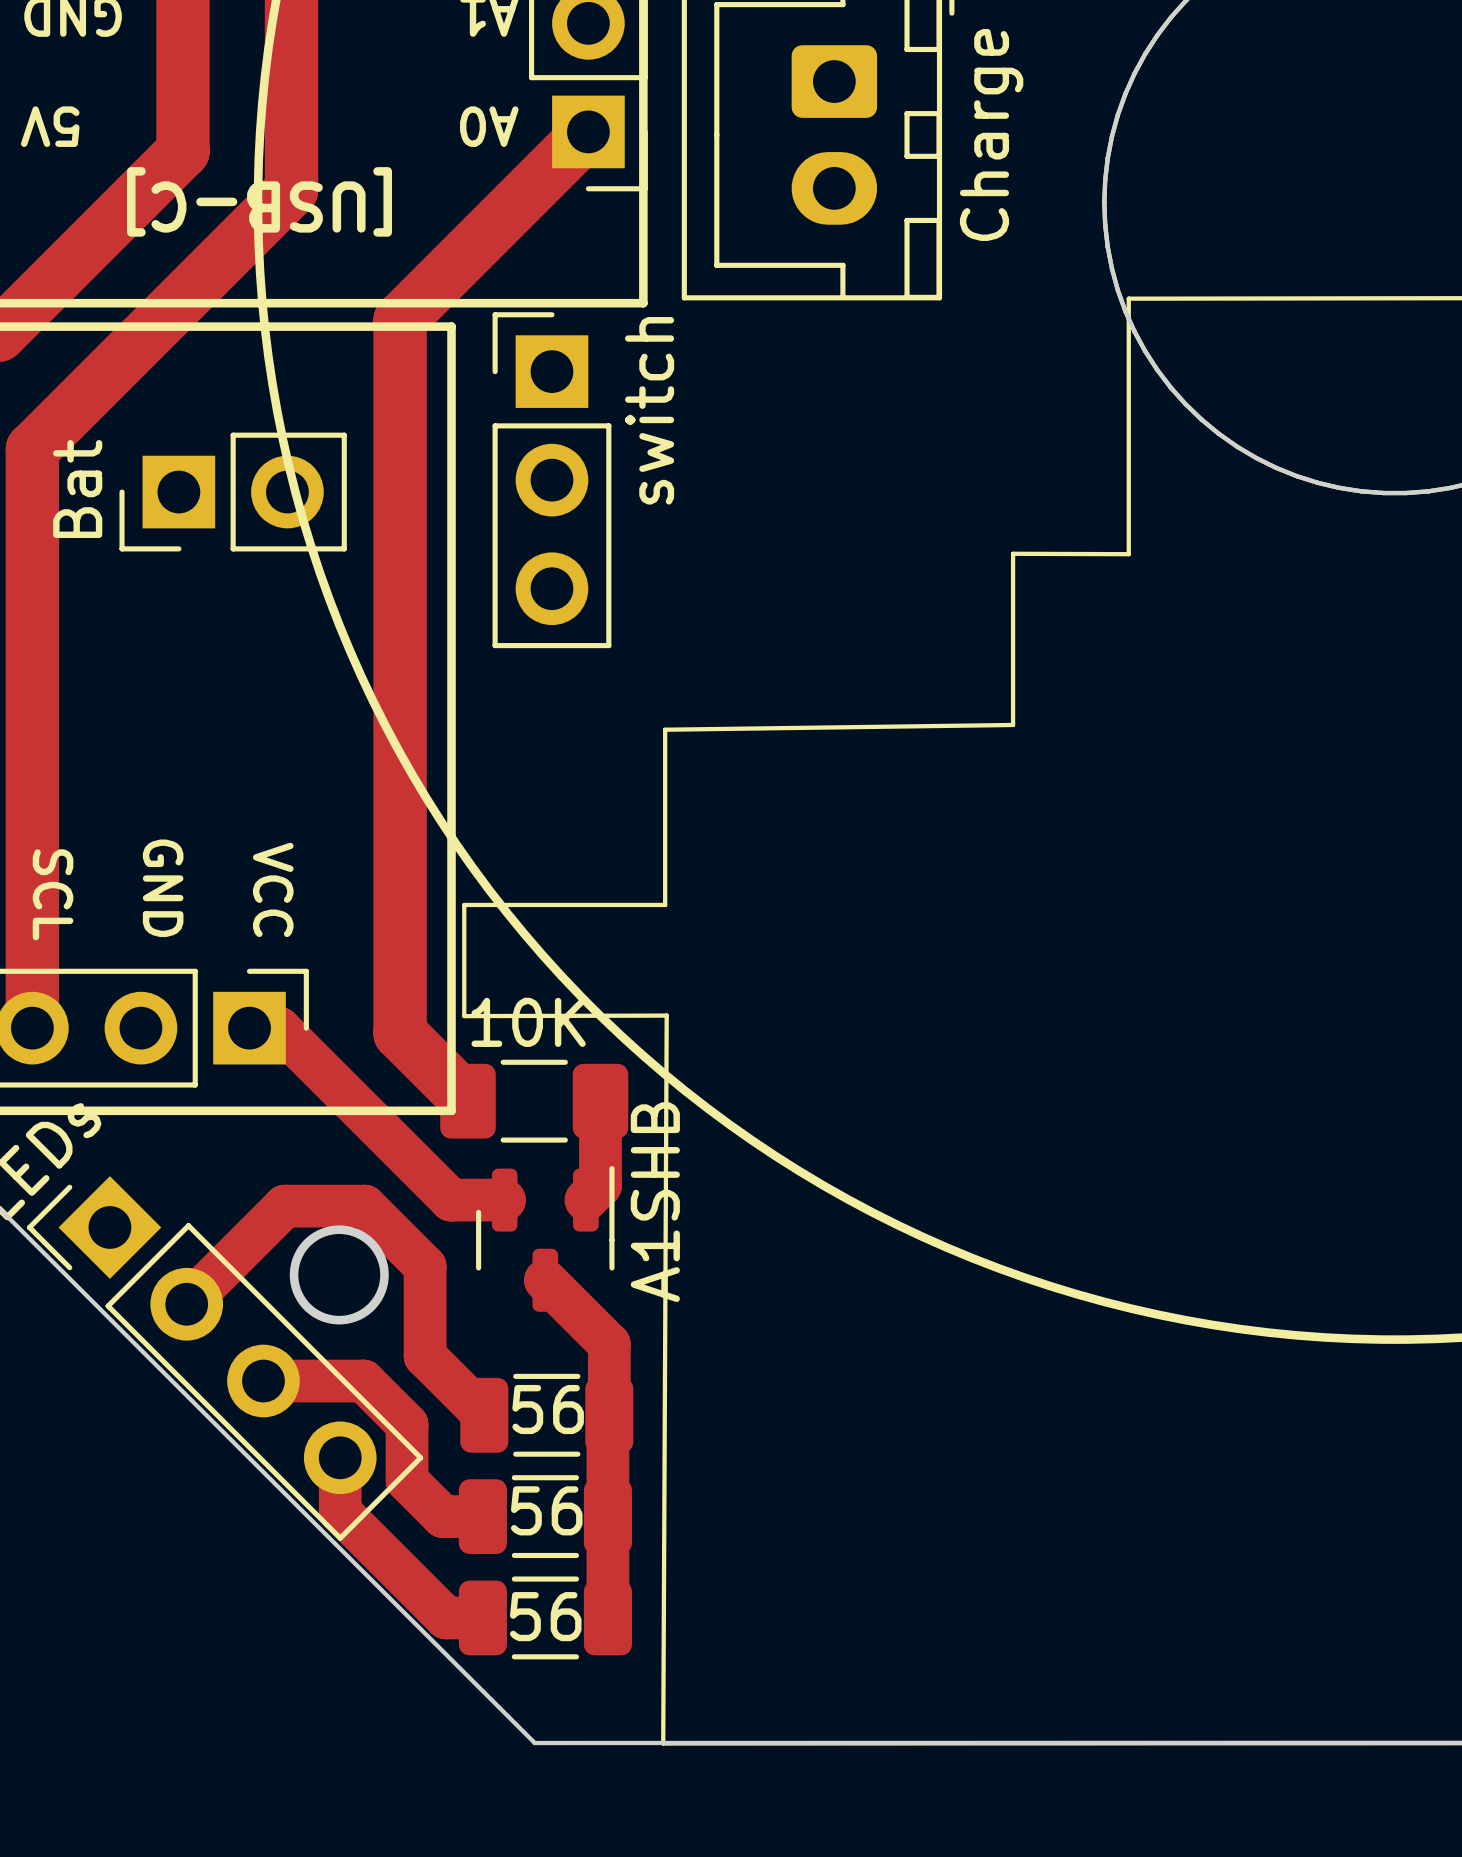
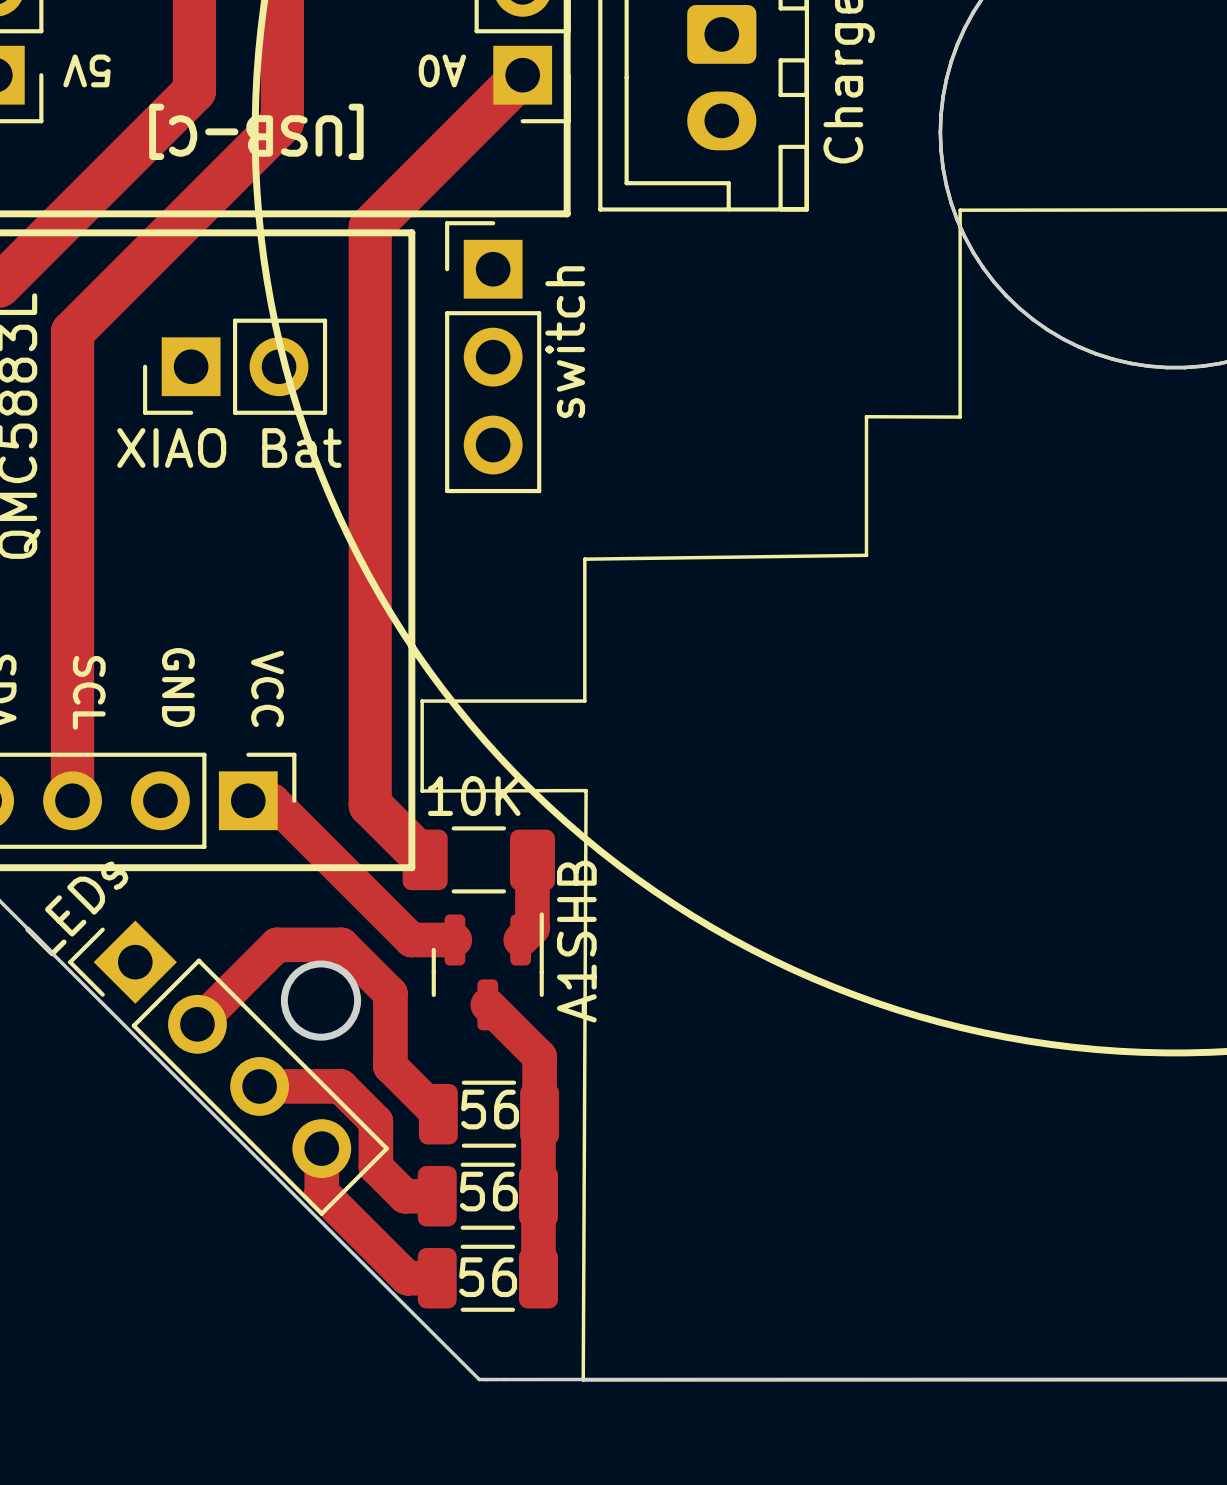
switch name position: switch (649, 410) -> switch (565, 342)
Bat name: Bat (77, 488) -> XIAO Bat (229, 447)

